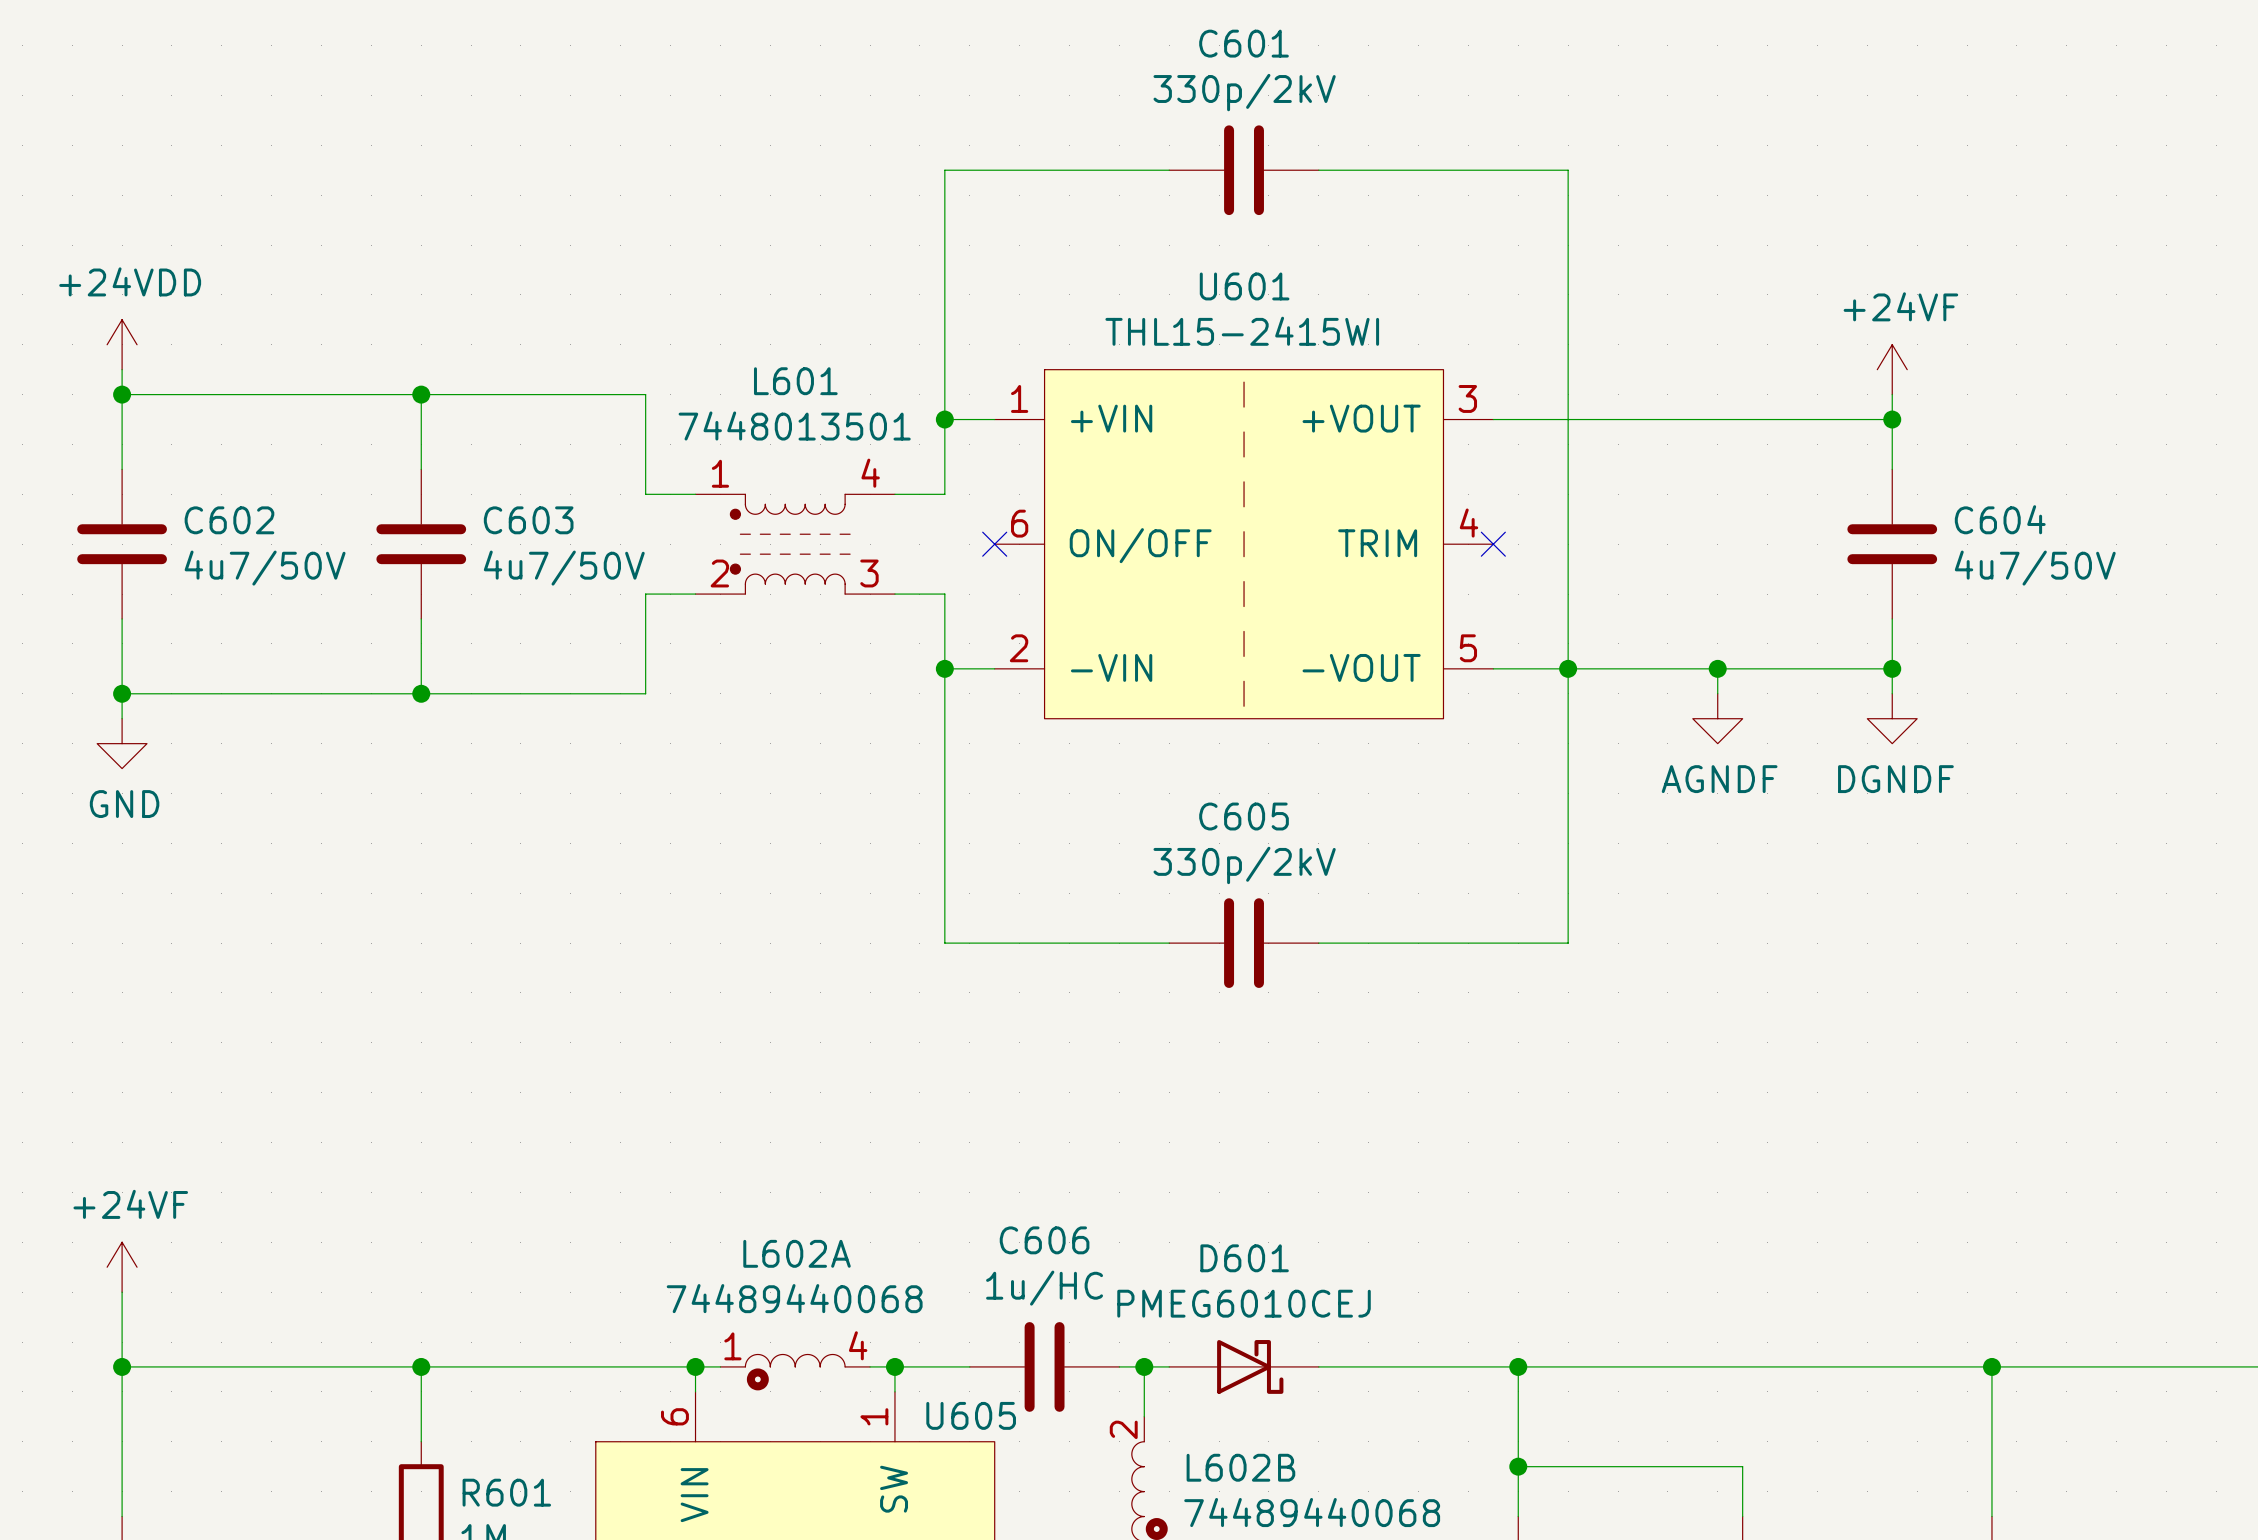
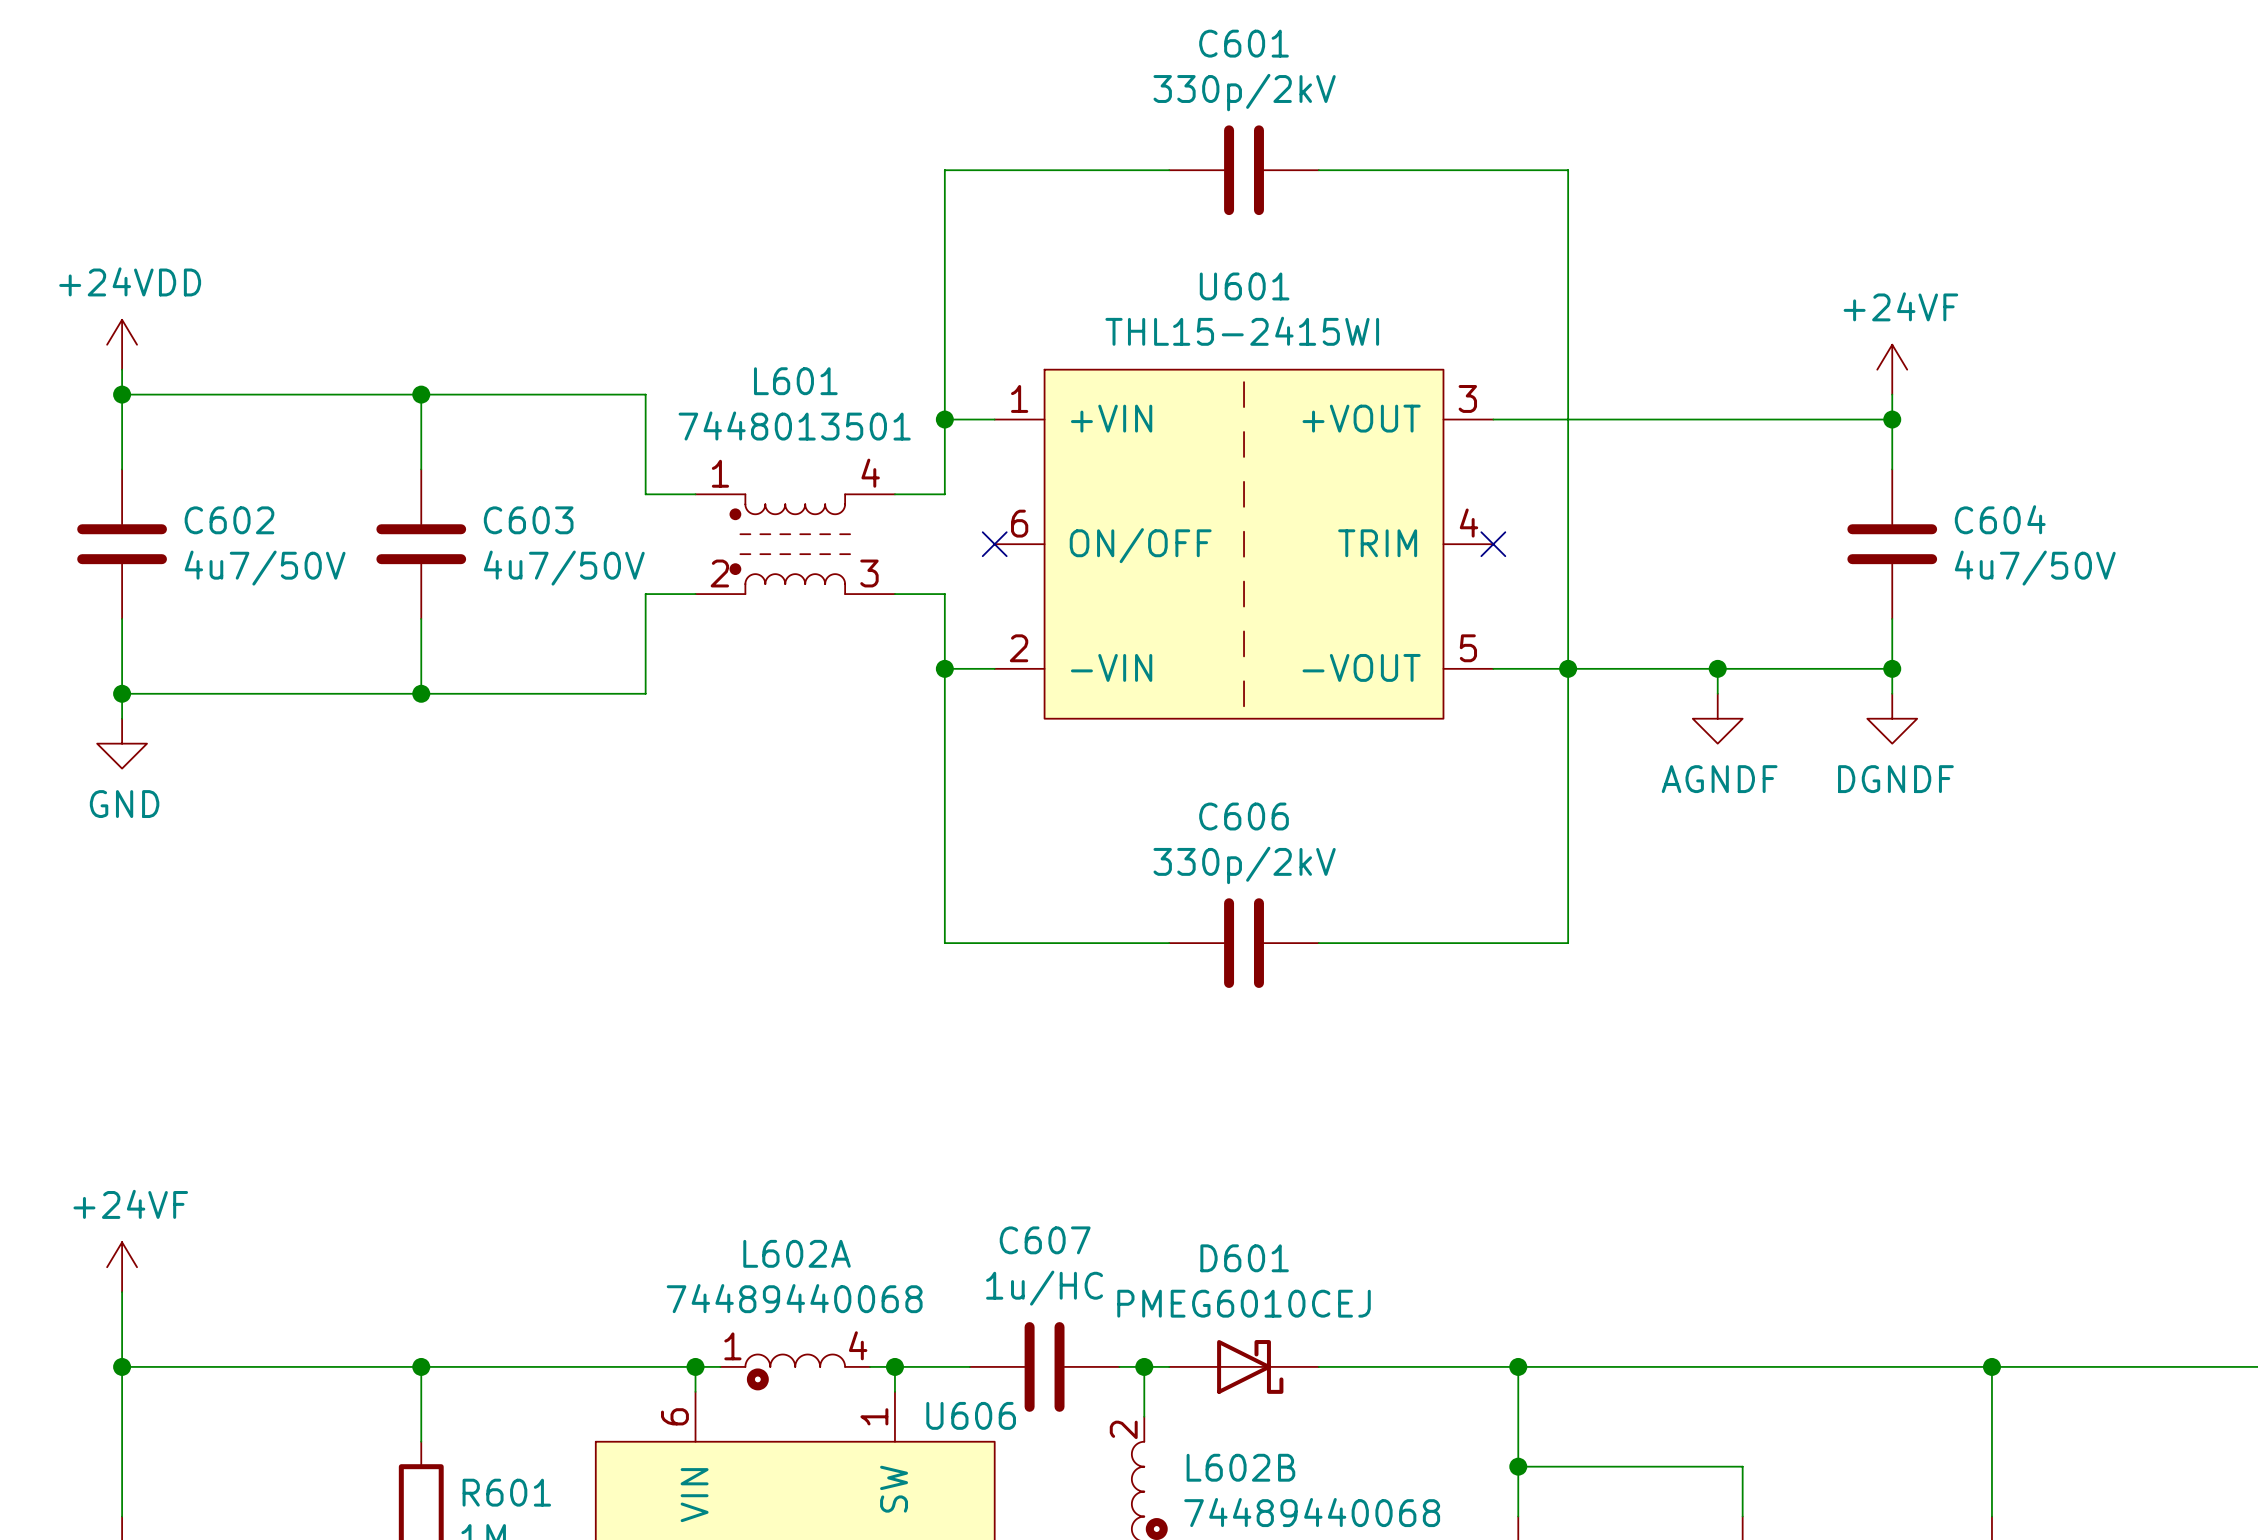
C605 name: C605 (1244, 816) -> C606 (1244, 816)
C606 name: C606 (1044, 1240) -> C607 (1045, 1240)
U605 name: U605 (971, 1415) -> U606 (971, 1415)

